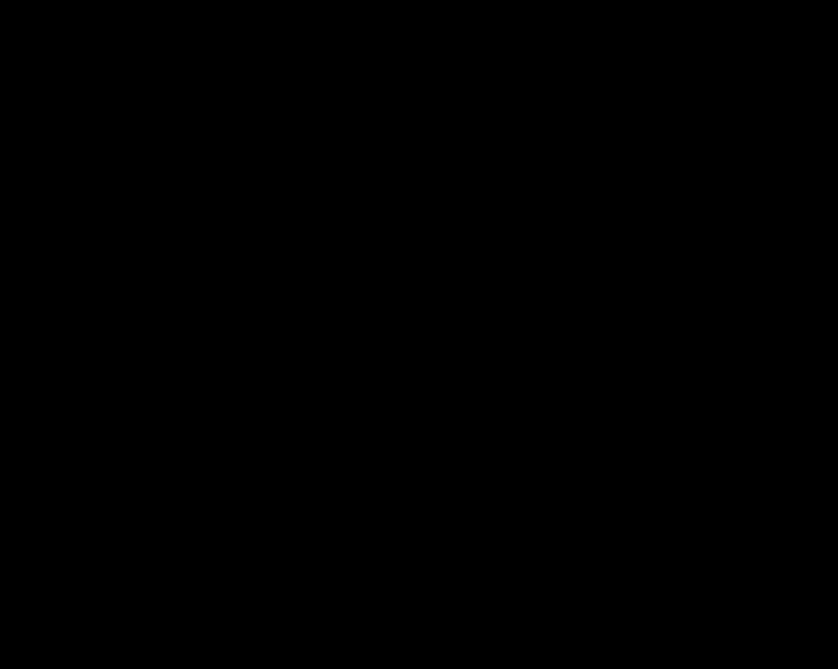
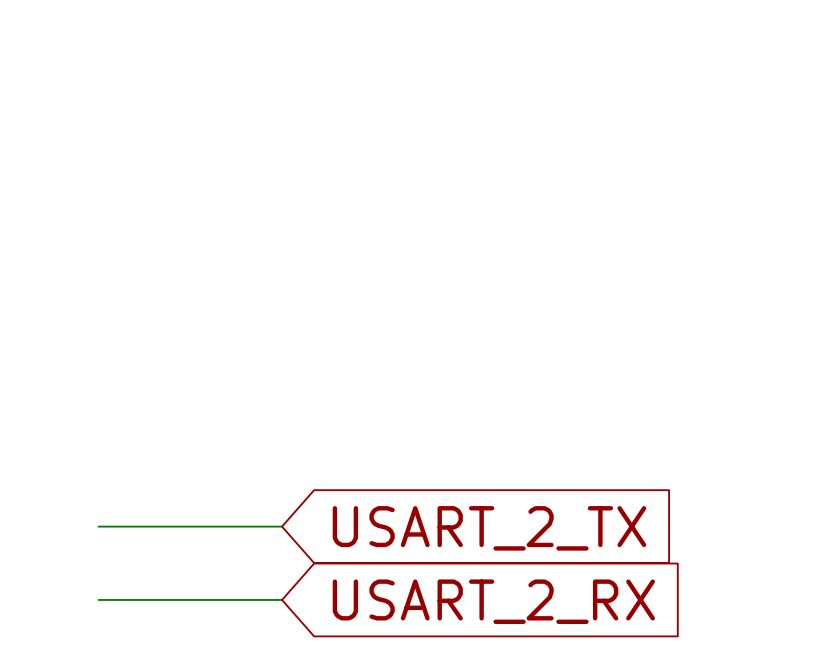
wire: none -> (98, 526) (282, 526)
global label: none -> USART_2_TX (489, 528)
wire: none -> (98, 599) (282, 599)
global label: none -> USART_2_RX (493, 601)

